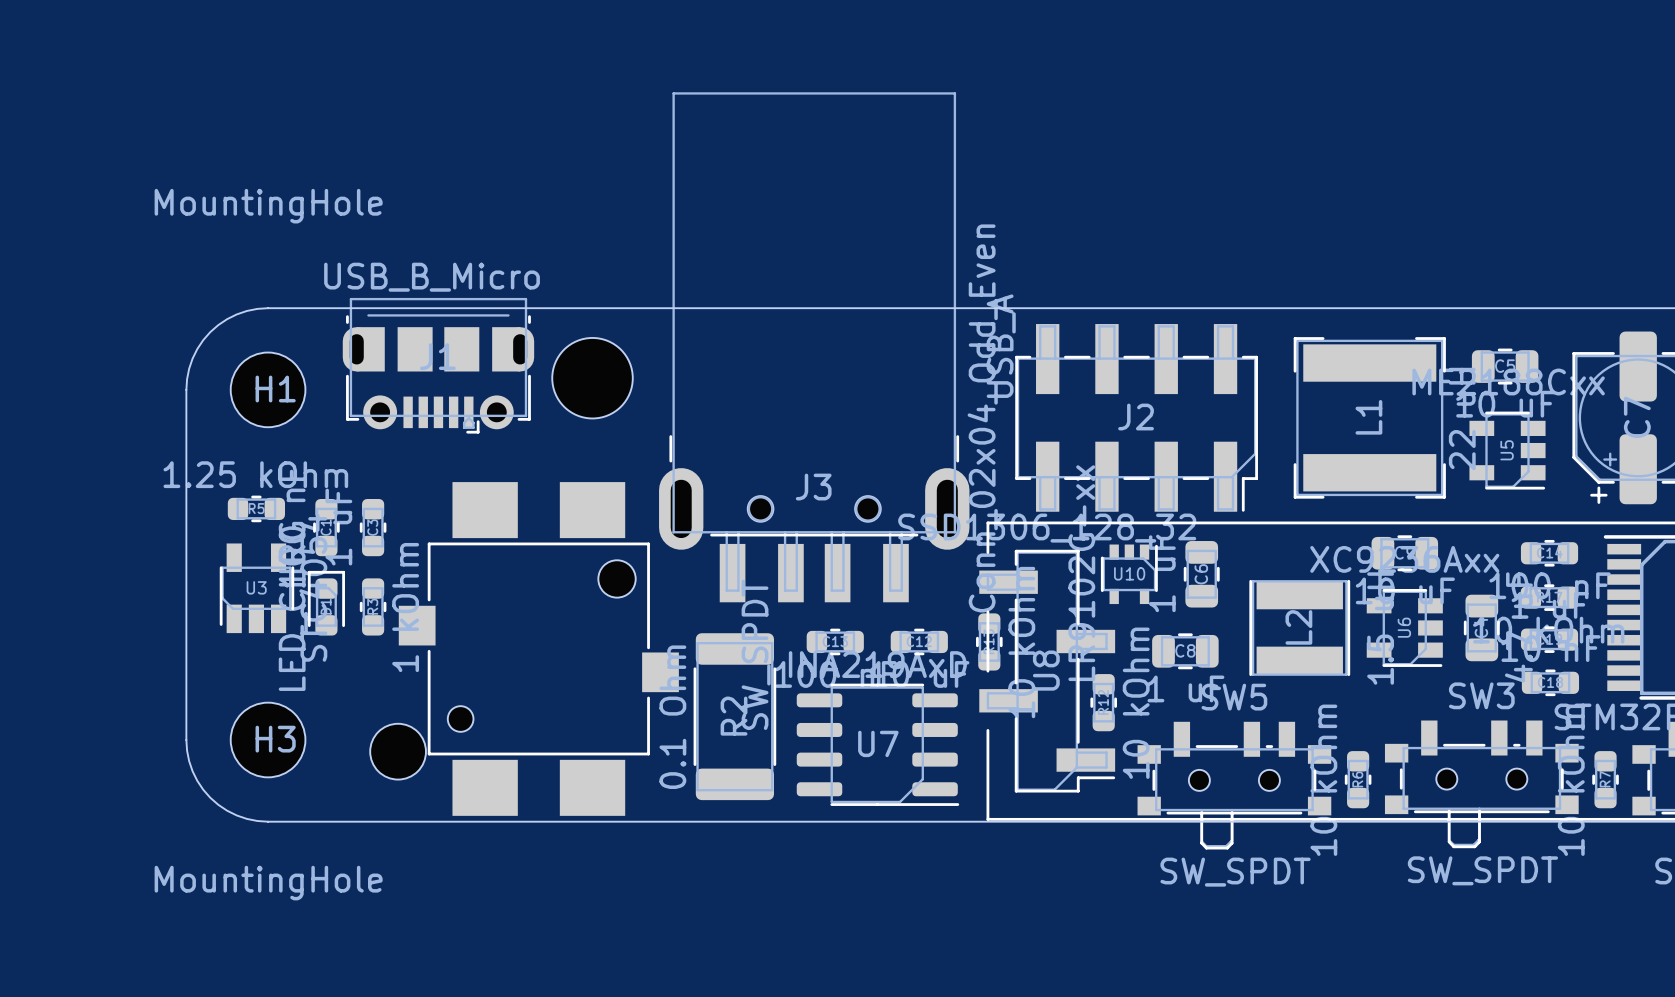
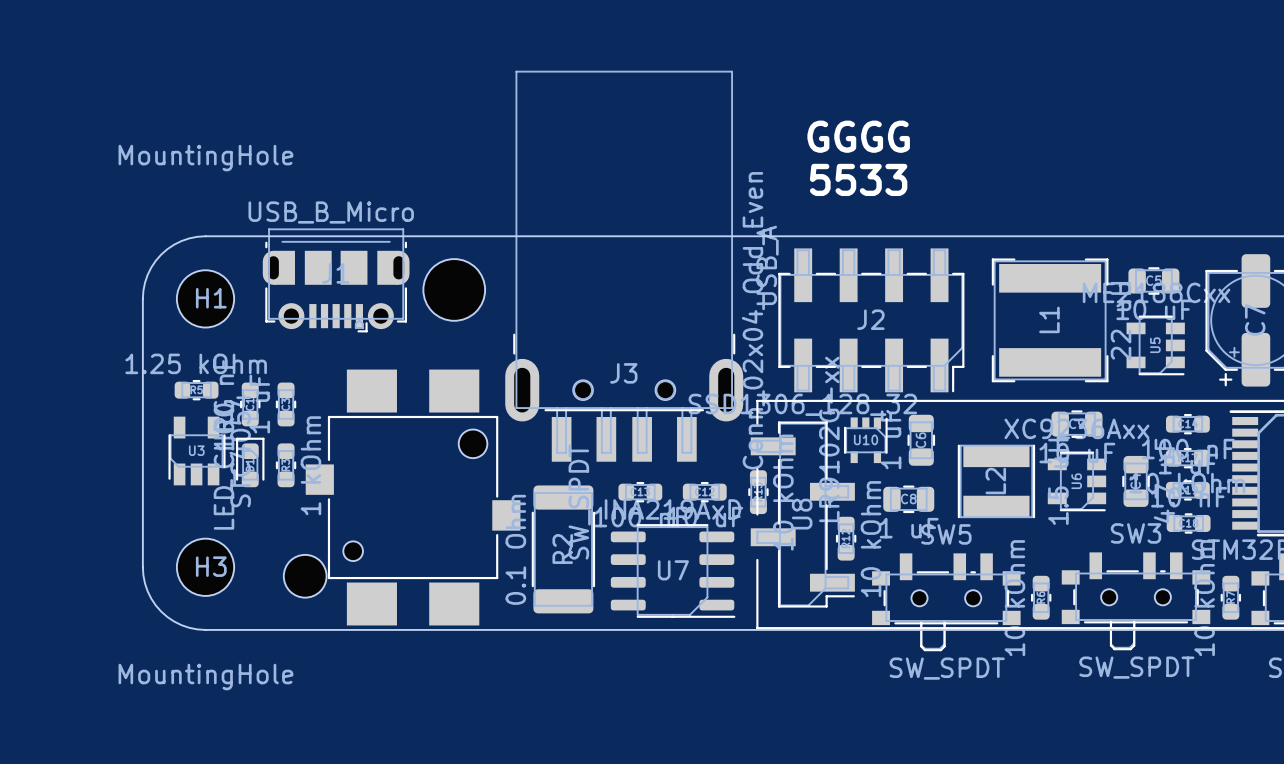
text: none -> GGGG (858, 136)
text: none -> 5533 (858, 179)

